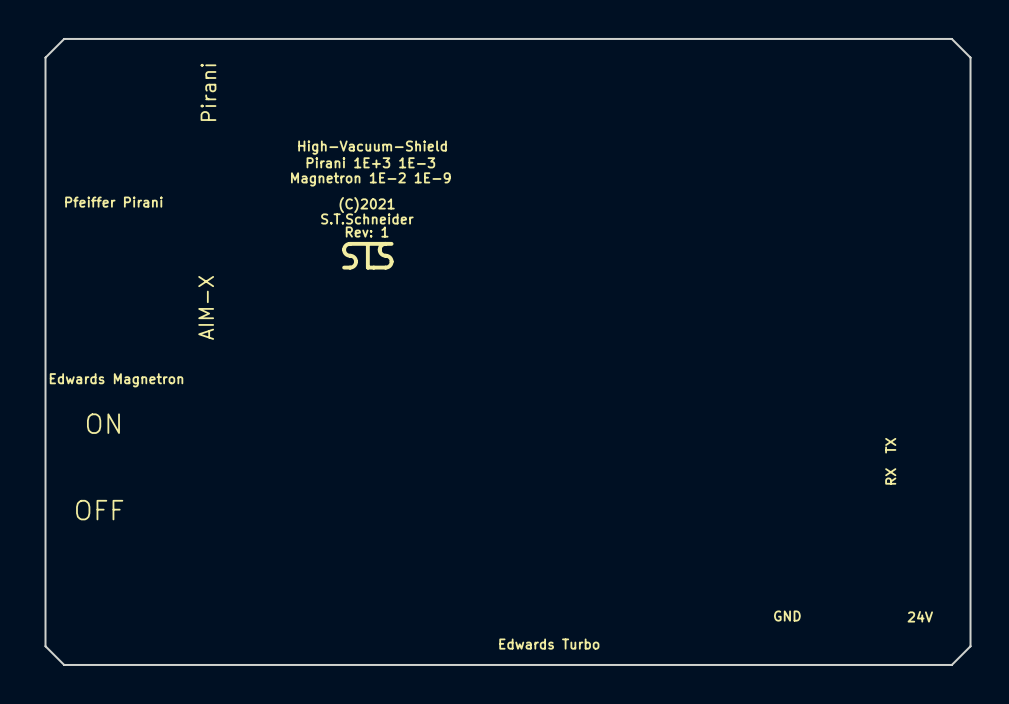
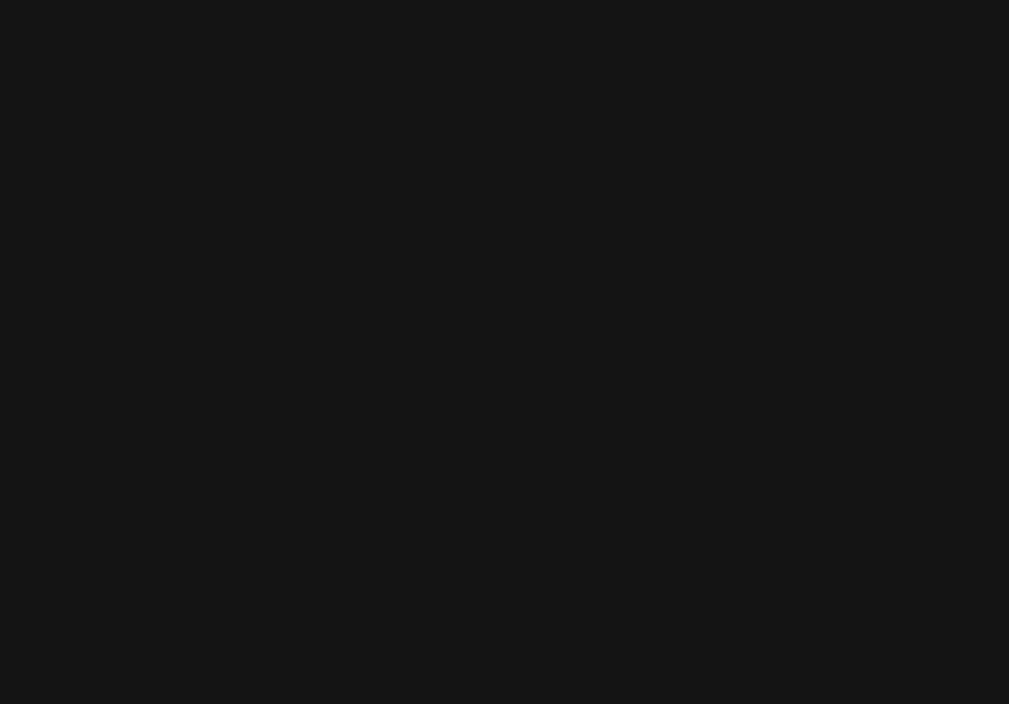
board edge: (64, 38) (45, 57) (45, 646) (64, 664) (951, 664) (970, 646) (970, 57) (951, 38) (64, 38) -> none
text: Pirani (208, 92) -> none
text: High-Vacuum-Shield (372, 147) -> none
text: Pirani 1E+3 1E-3 (370, 162) -> none
text: Magnetron 1E-2 1E-9 (370, 179) -> none
text: Pfeiffer Pirani (113, 202) -> none
text: (C)2021 (367, 205) -> none
text: S.T.Schneider (367, 218) -> none
text: Rev: 1 (367, 232) -> none
drawing: [342, 241, 394, 270] -> none
text: AIM-X (206, 307) -> none
text: Edwards Magnetron (116, 380) -> none
text: ON (103, 423) -> none
text: RX TX (890, 461) -> none
text: OFF (99, 510) -> none
text: GND (787, 616) -> none
text: 24V (920, 616) -> none
text: Edwards Turbo (549, 644) -> none

